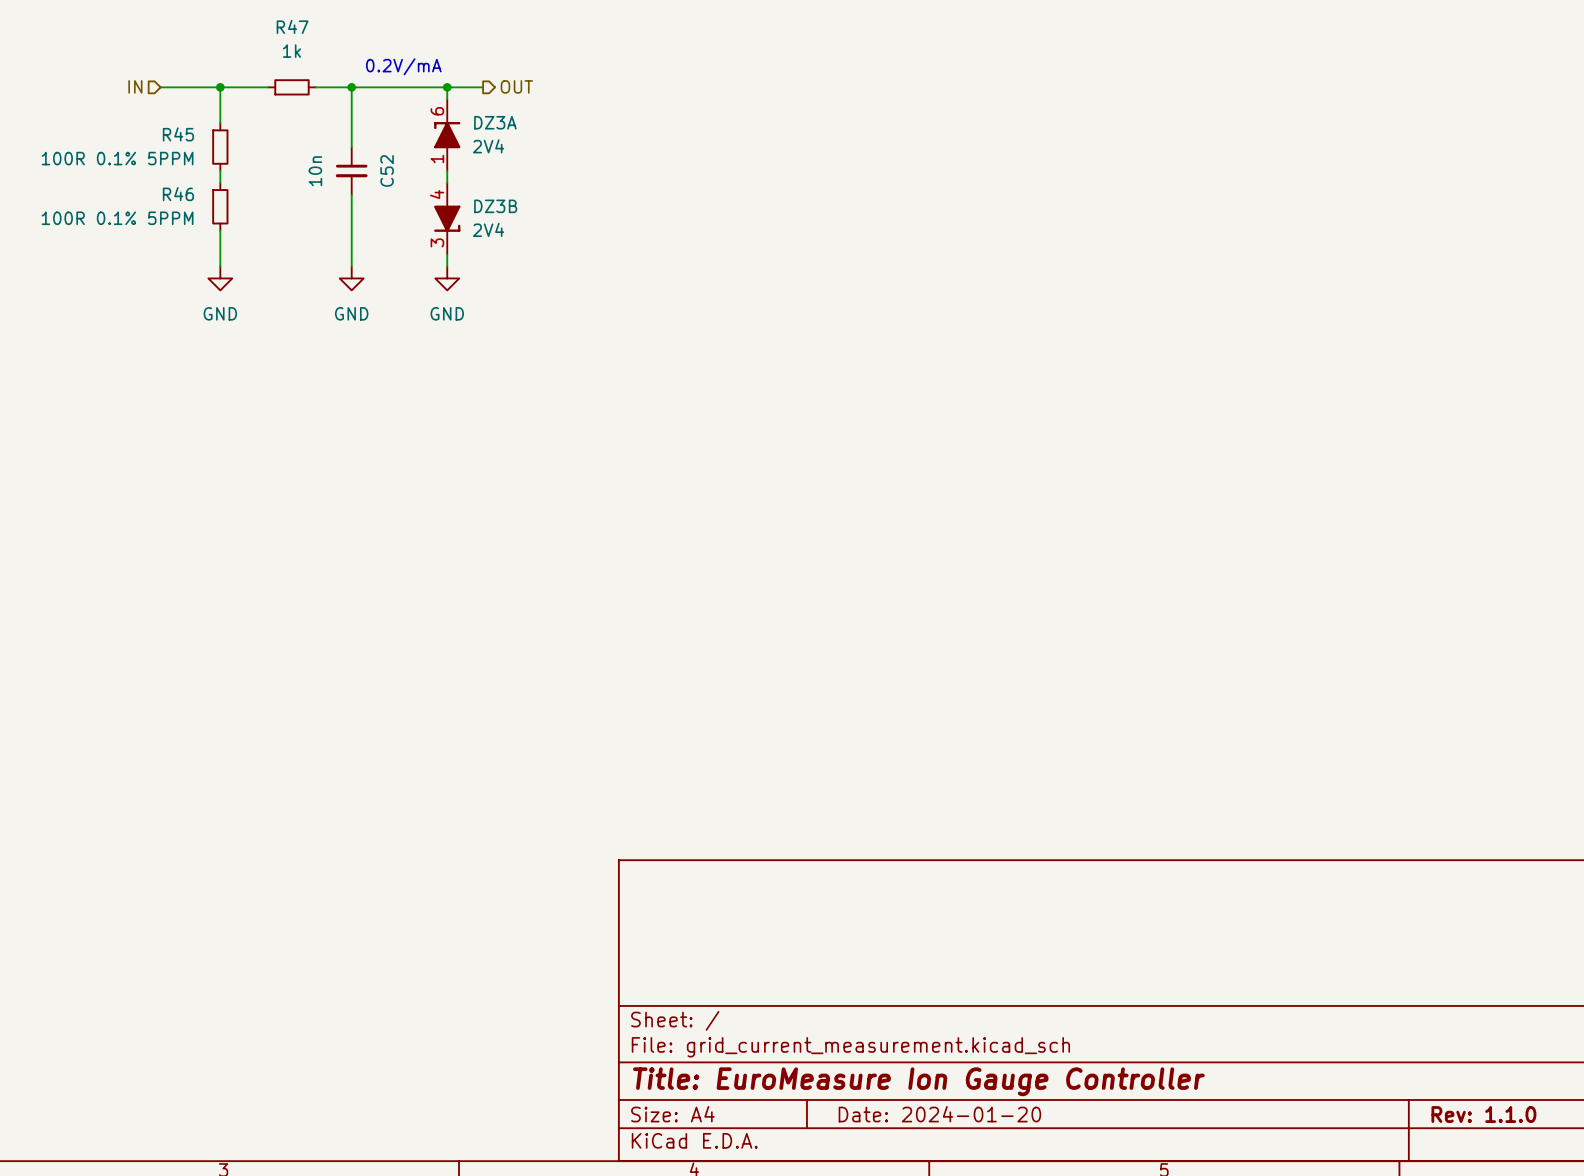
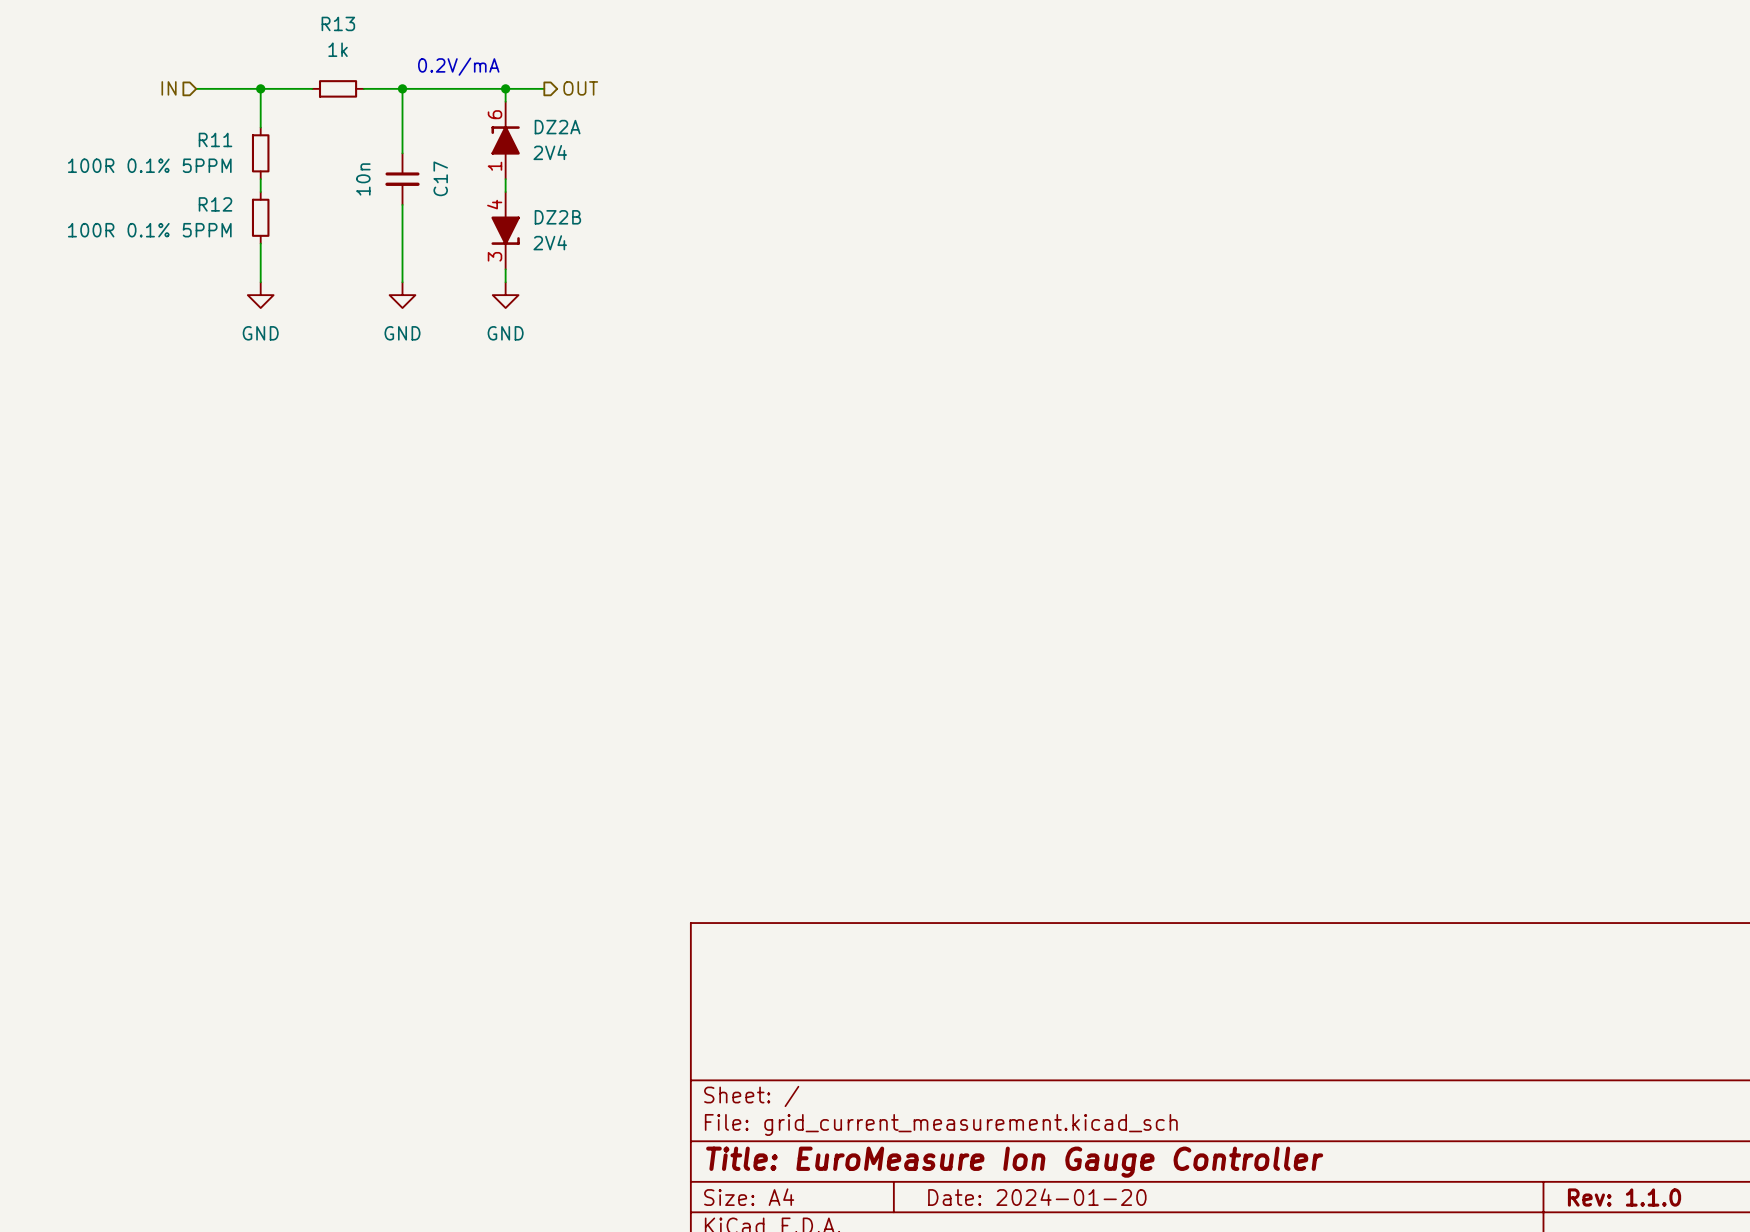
R47 name: R47 (292, 26) -> R13 (338, 23)
DZ3A name: DZ3A (495, 122) -> DZ2A (557, 127)
R45 name: R45 (178, 134) -> R11 (215, 139)
C52 name: C52 (387, 170) -> C17 (440, 178)
R46 name: R46 (178, 194) -> R12 (215, 204)
DZ3B name: DZ3B (495, 206) -> DZ2B (557, 217)

